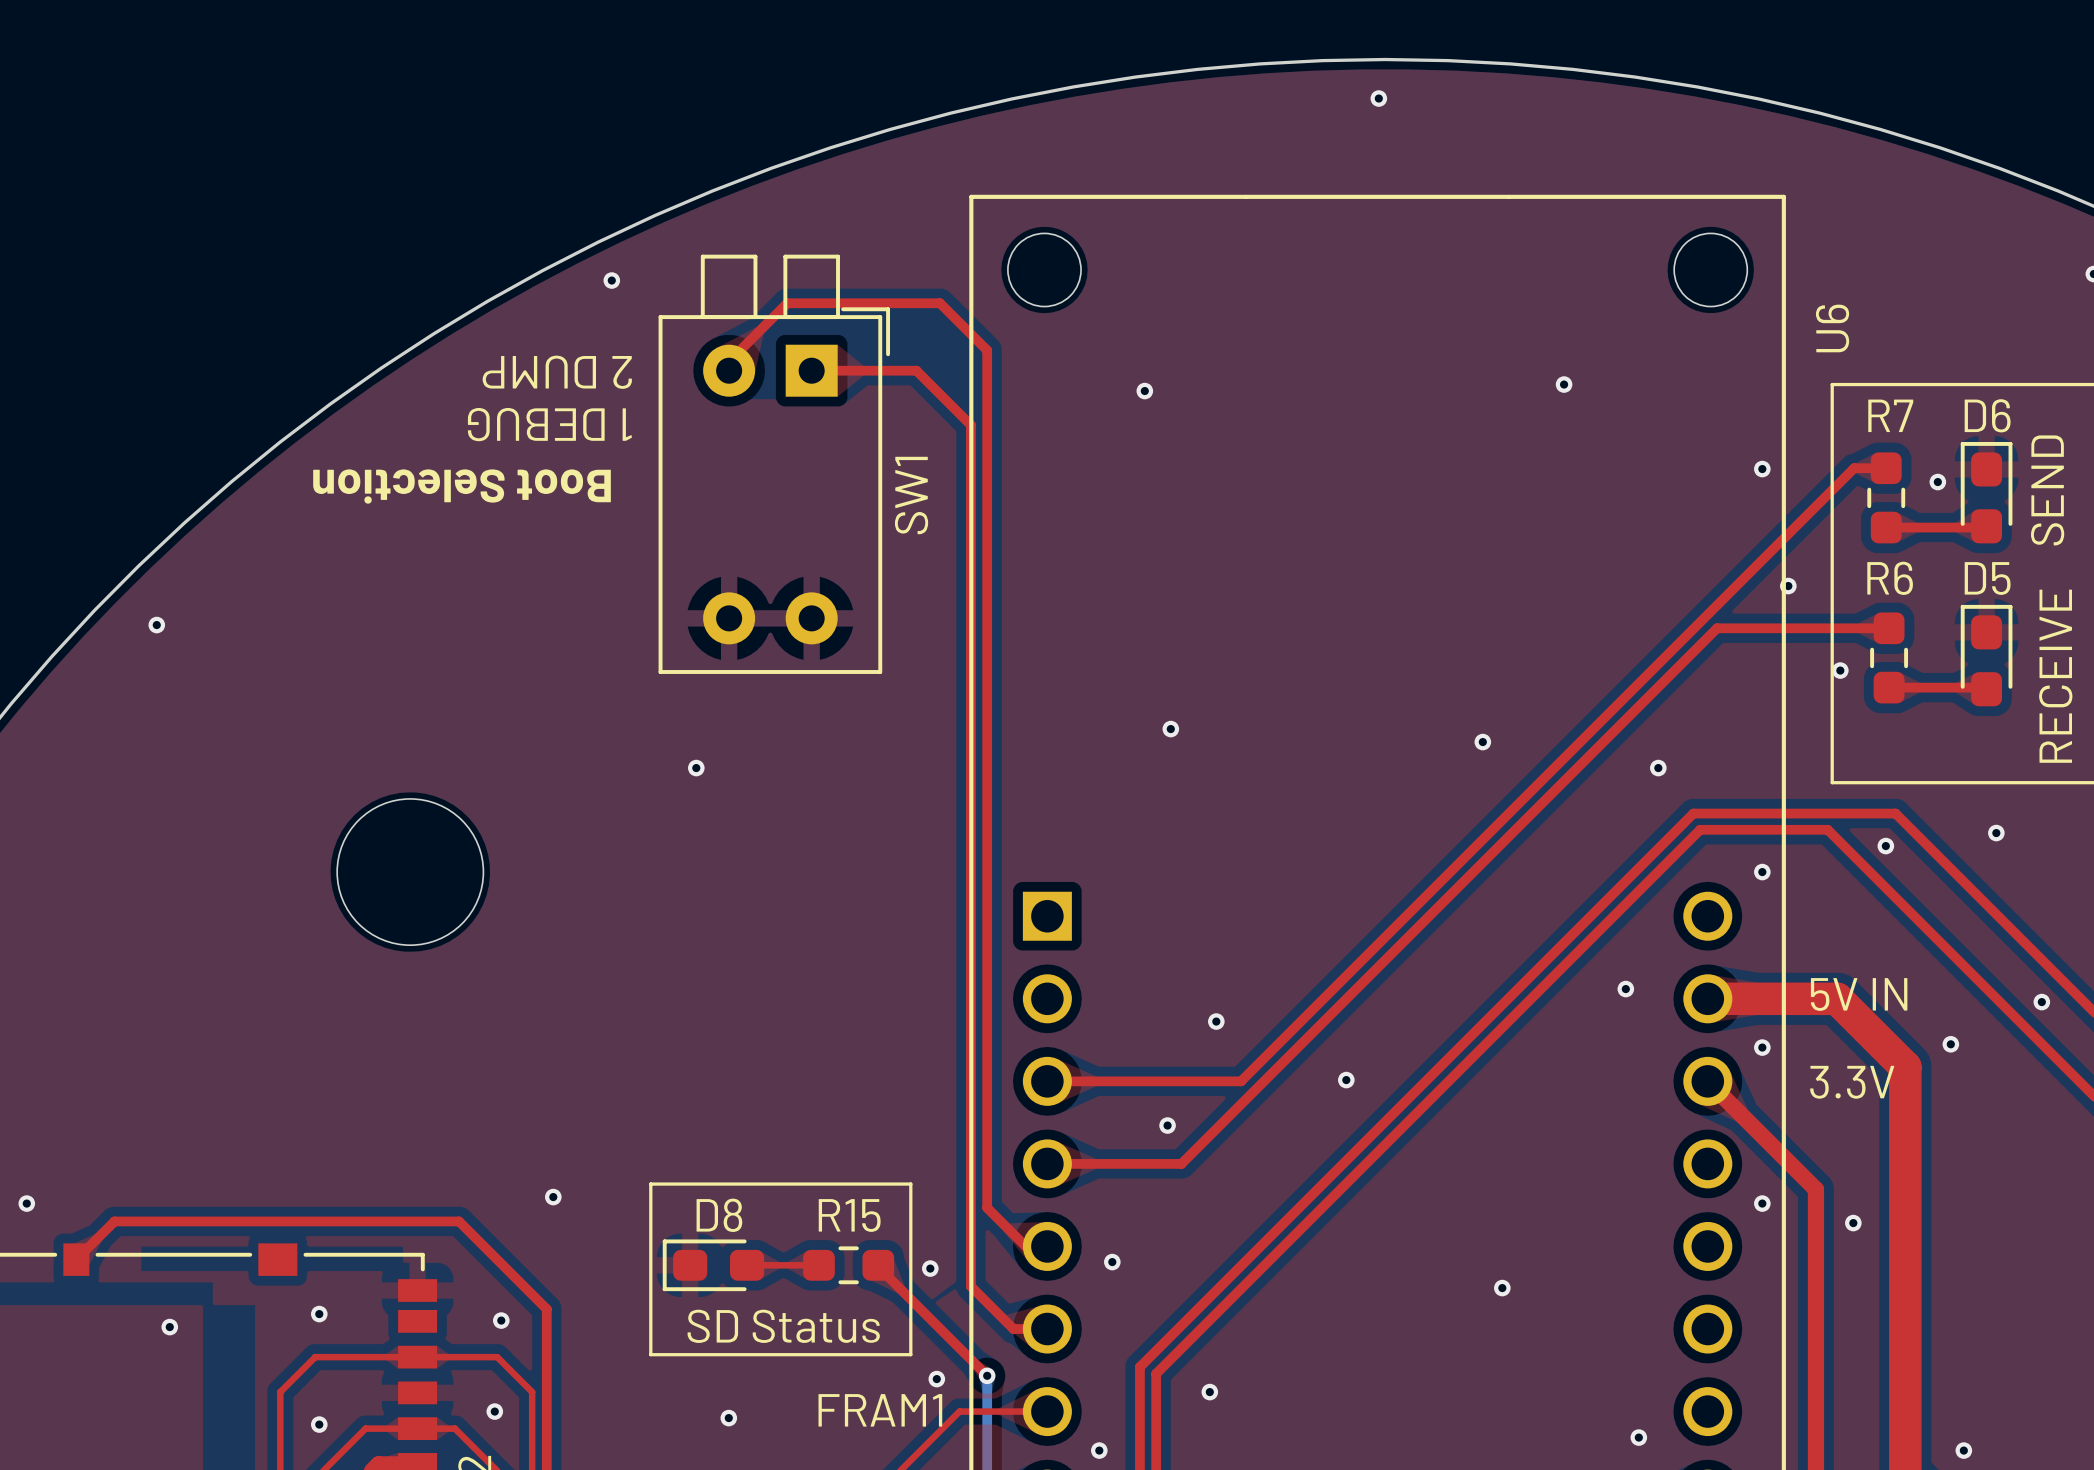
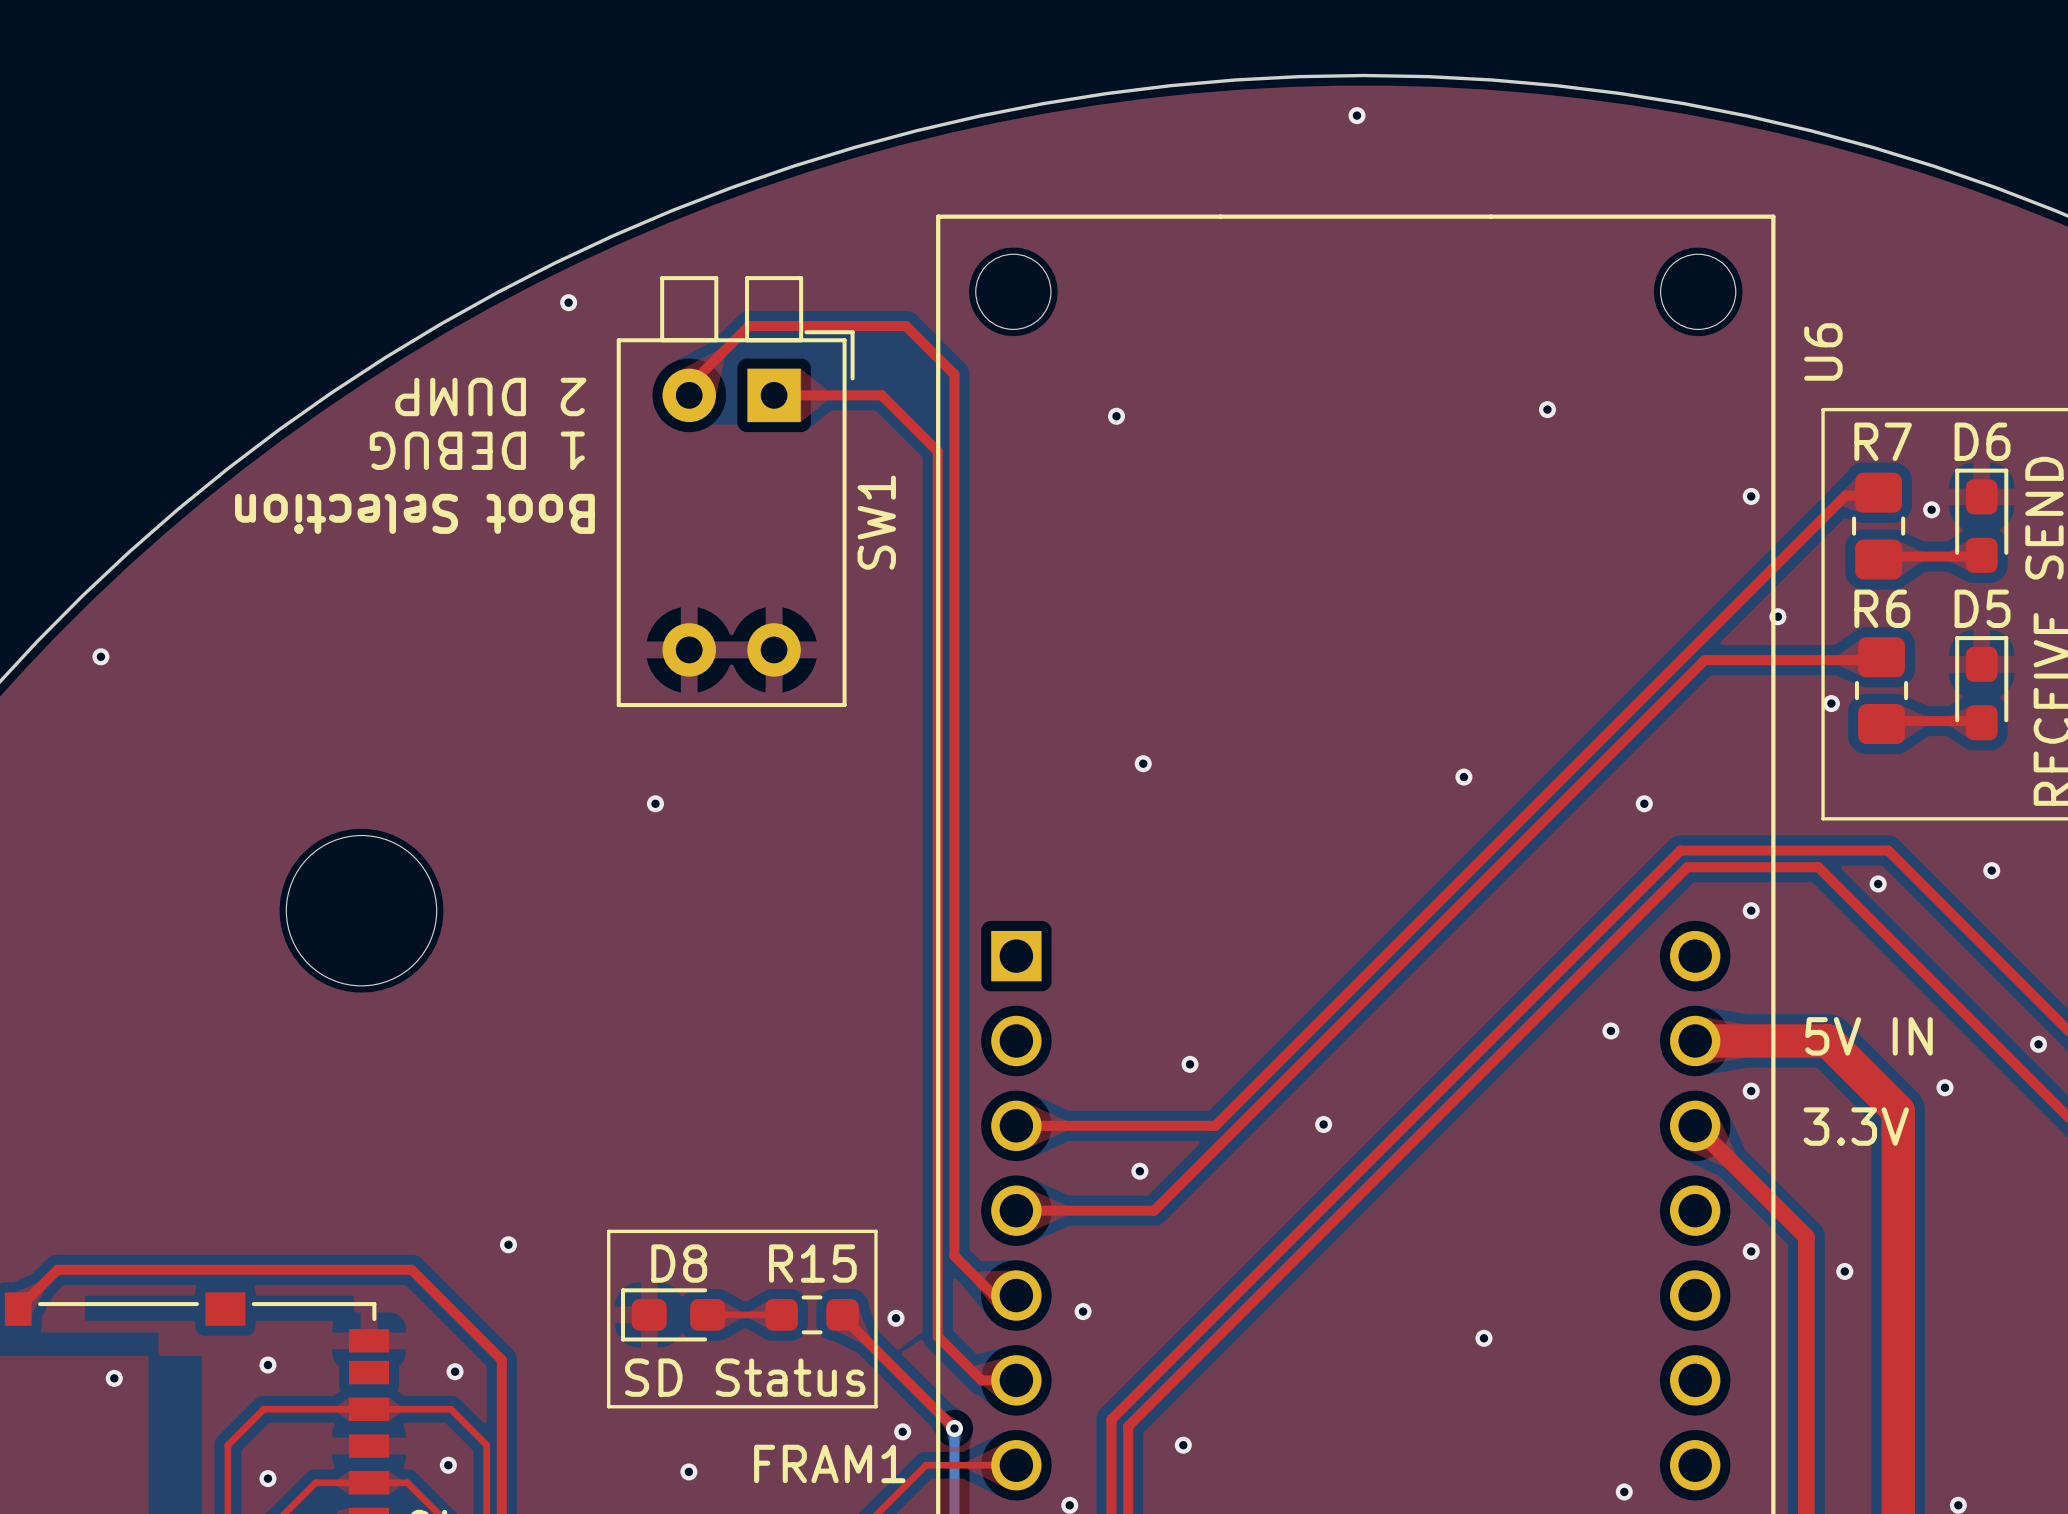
R7 footprint: [1867, 452, 1906, 544] -> [1852, 472, 1906, 580]
R6 footprint: [1870, 612, 1909, 704] -> [1854, 637, 1909, 745]

